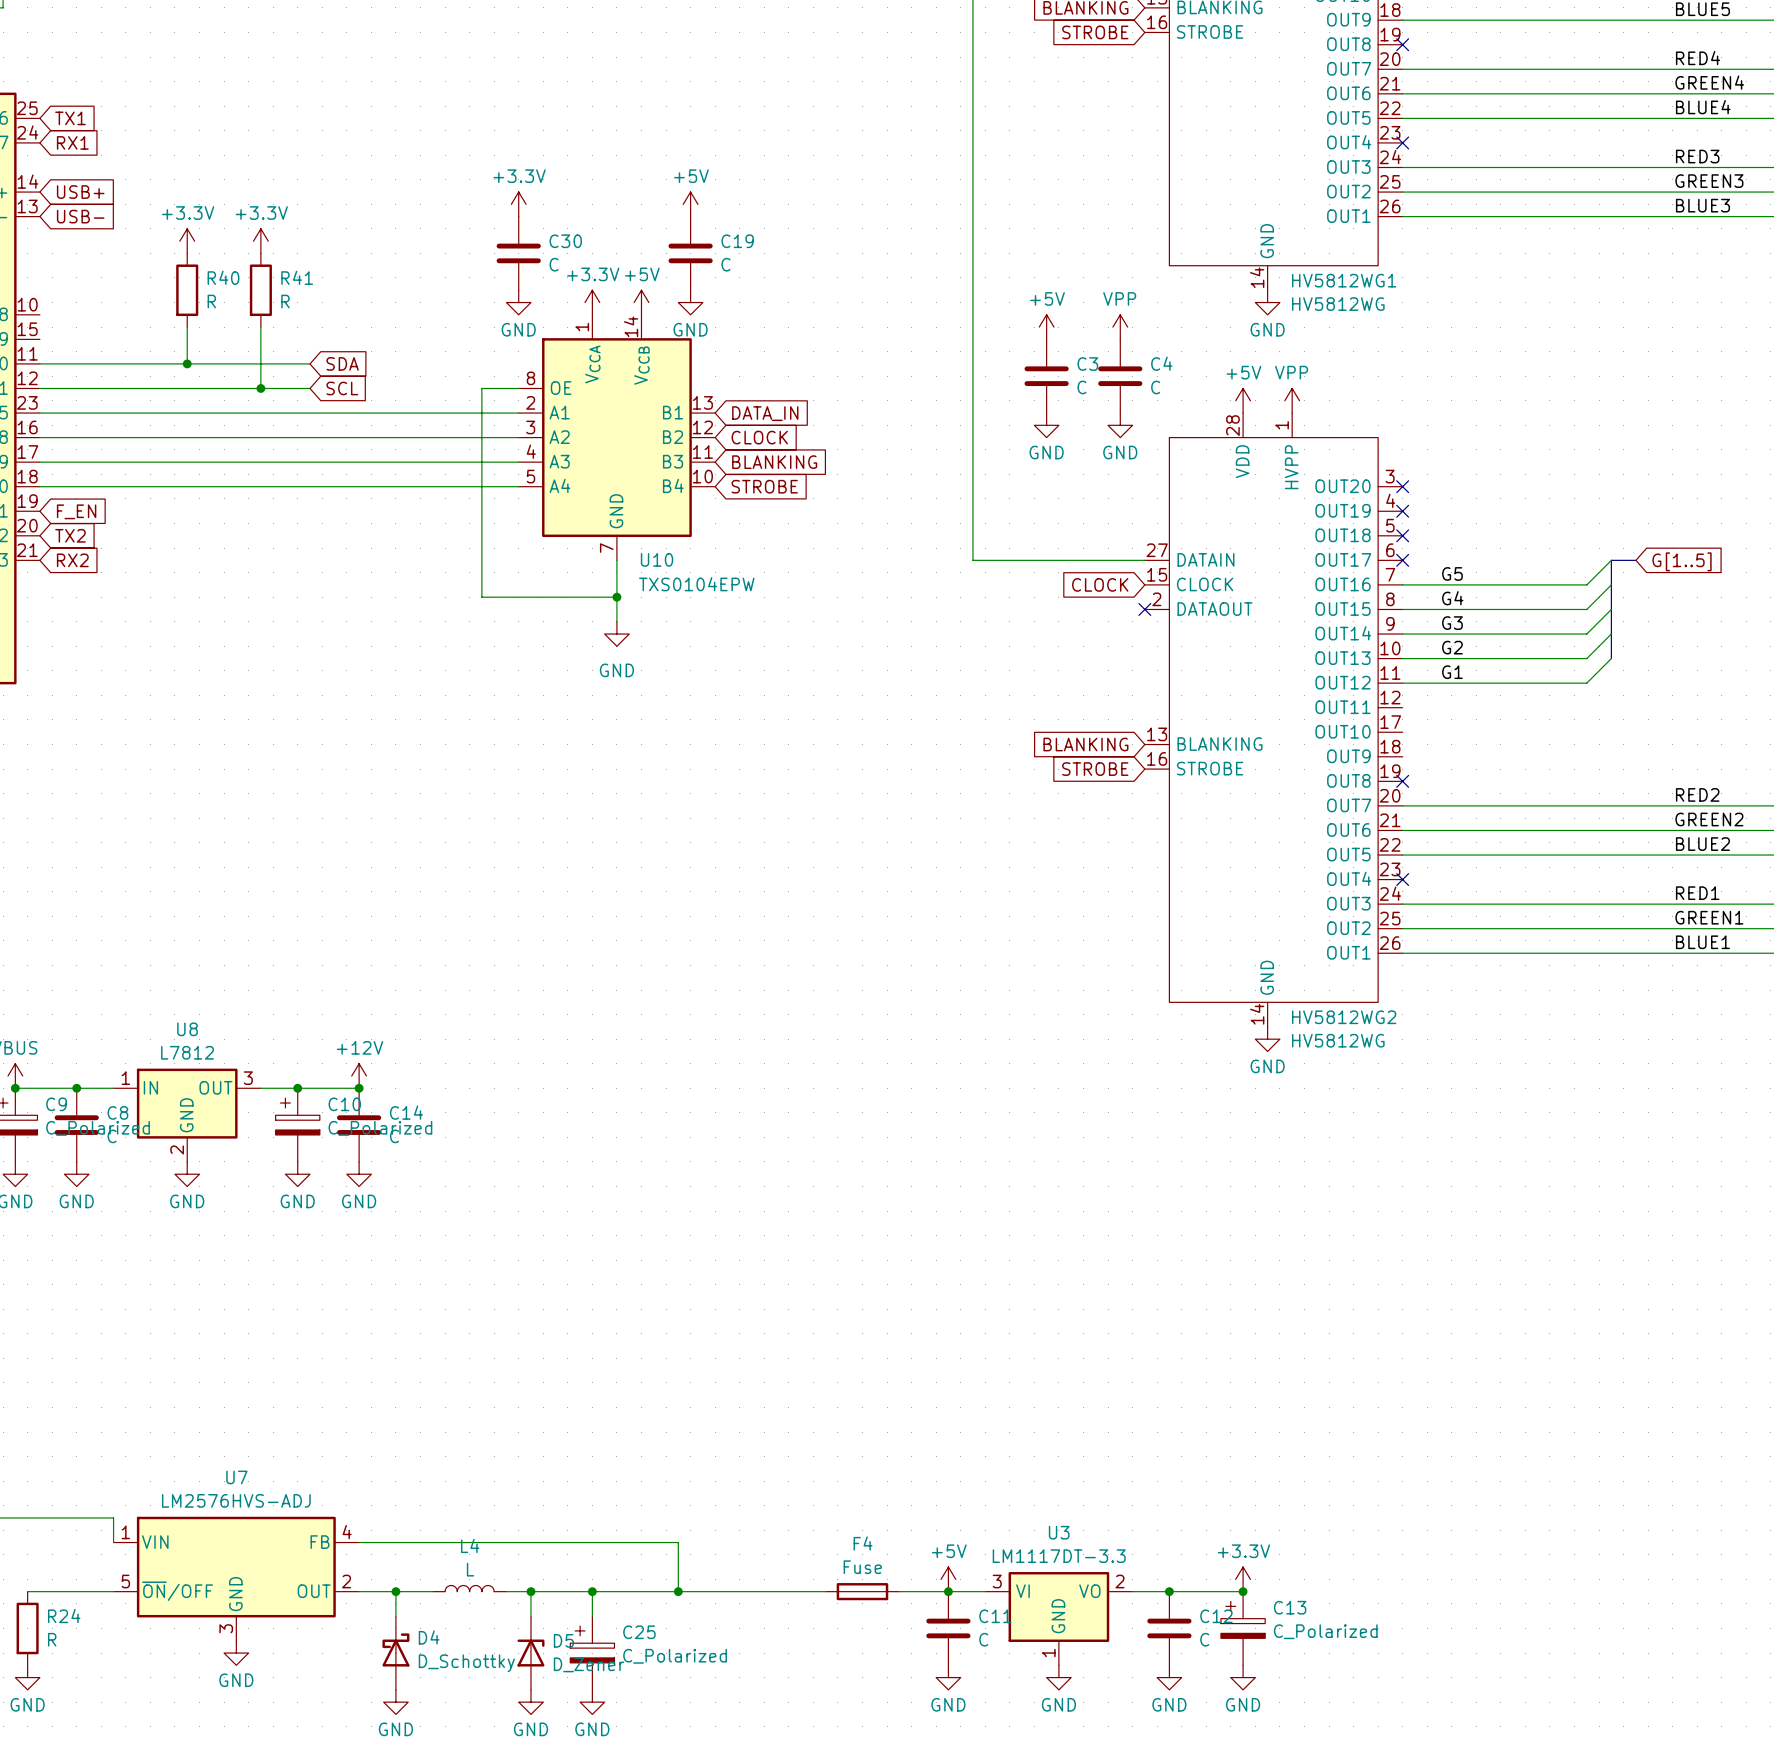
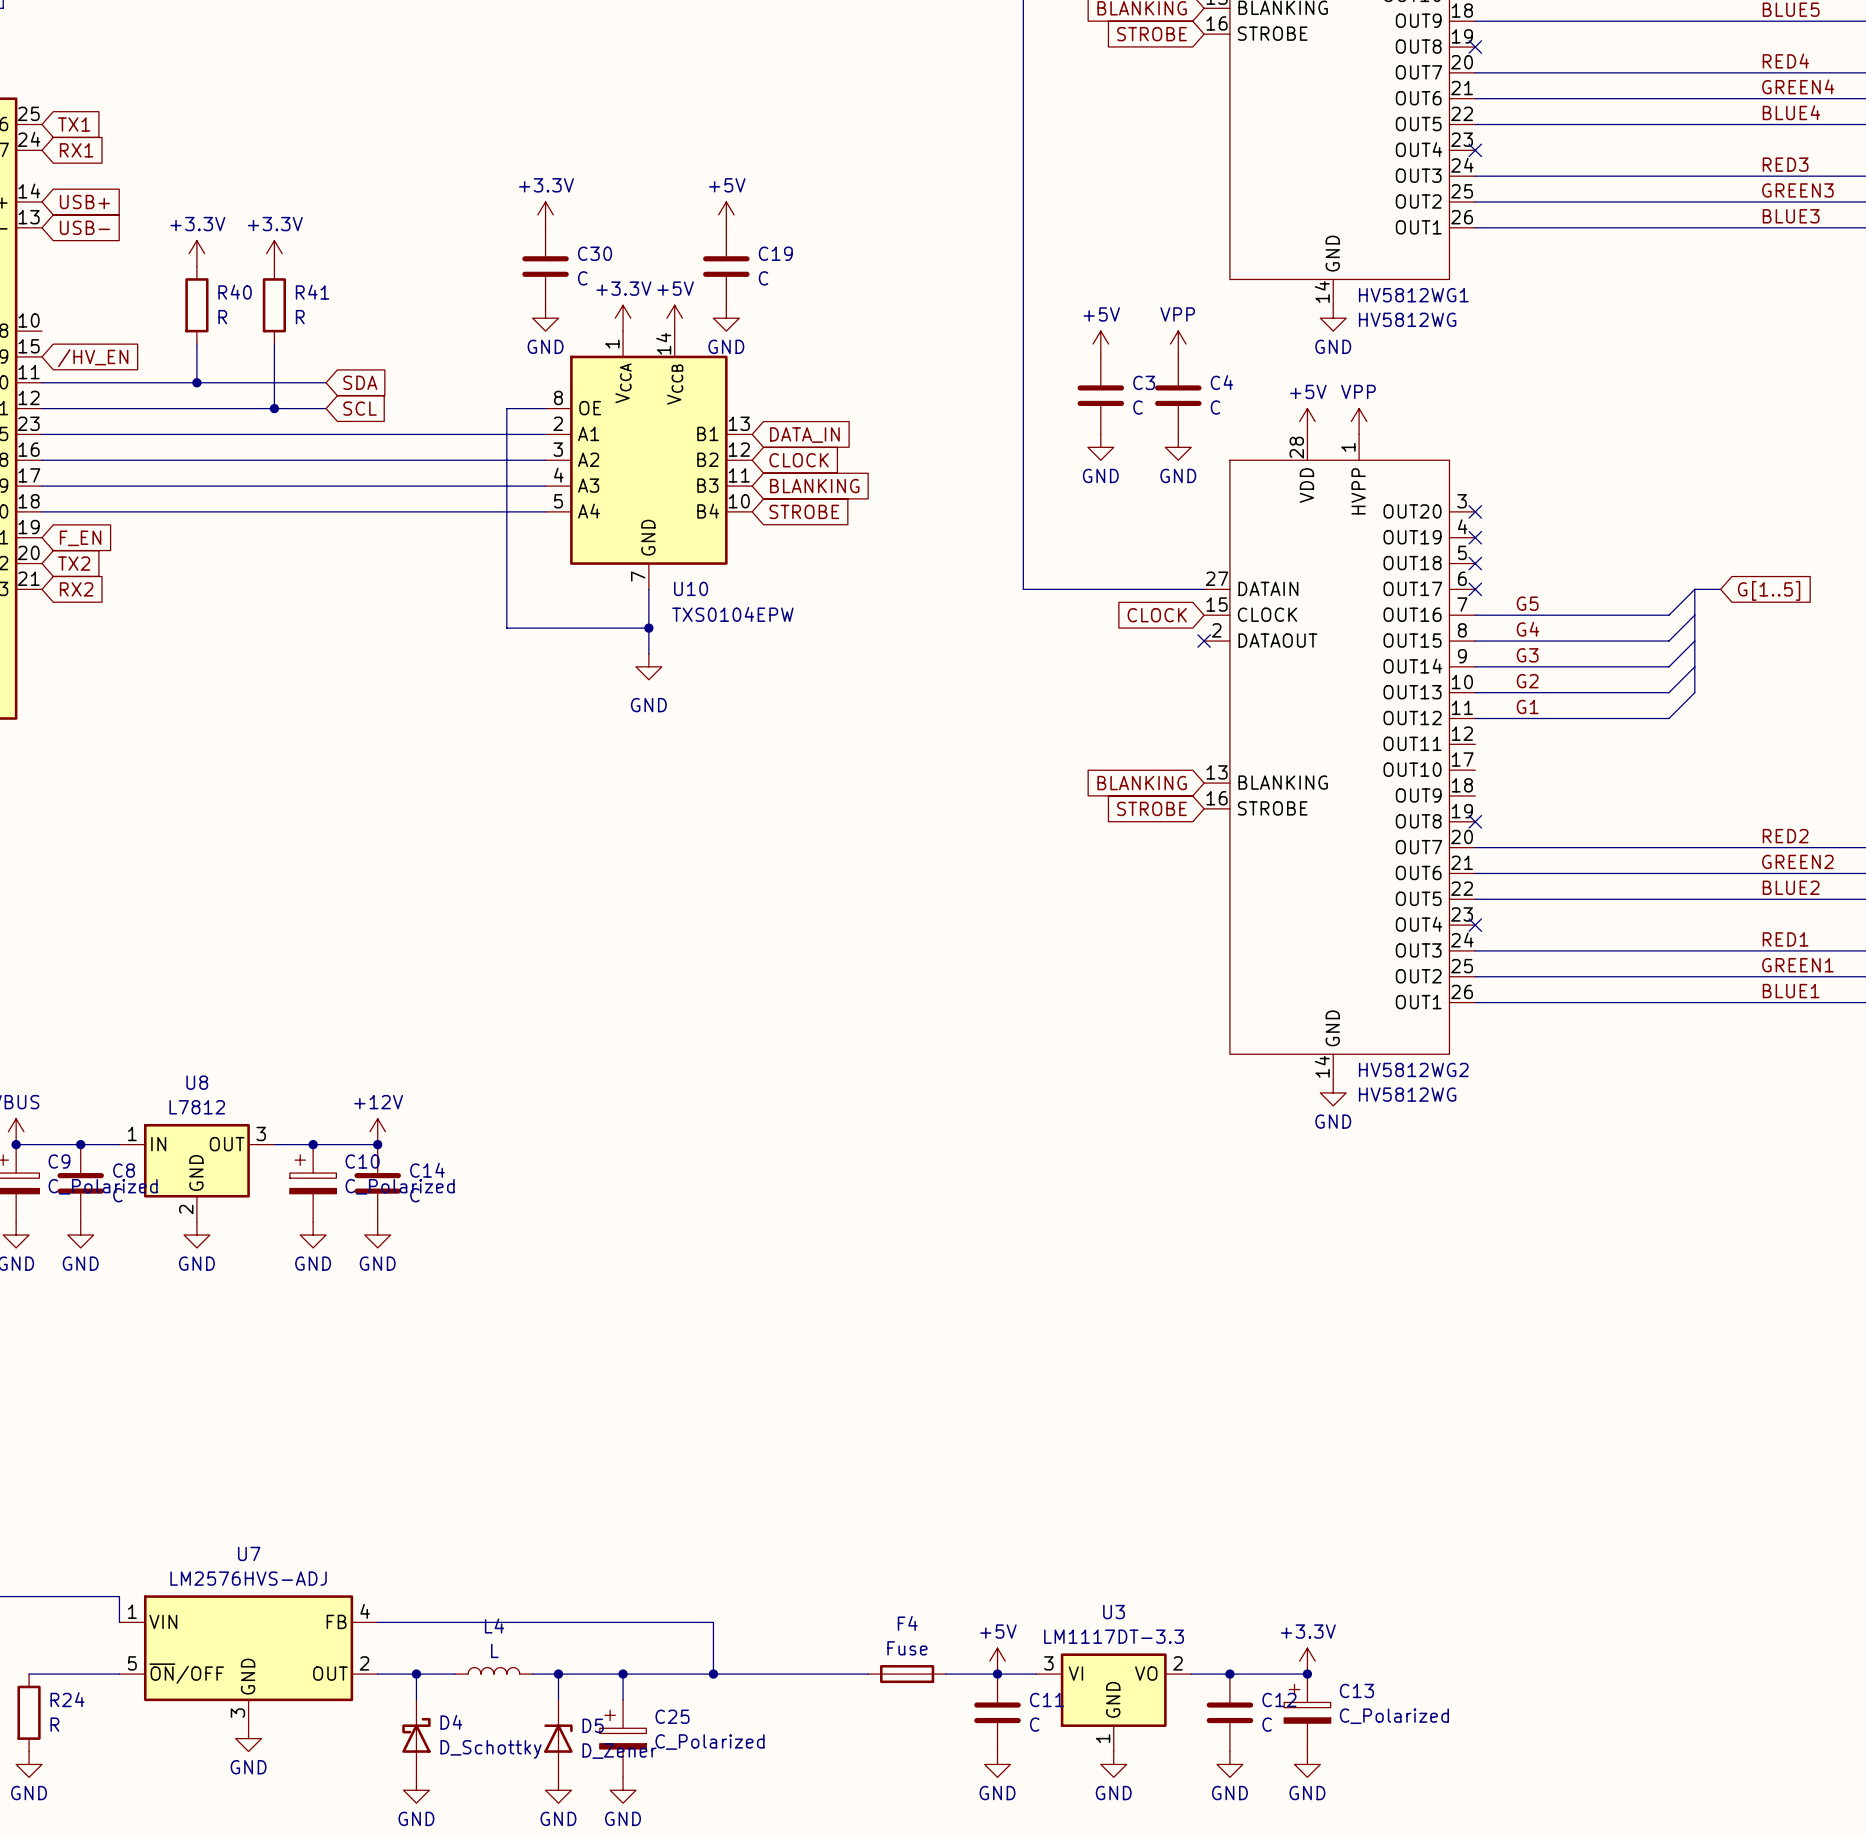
global label: none -> /HV_EN (93, 358)

